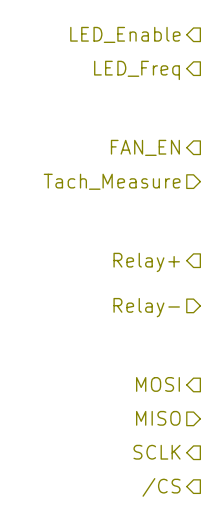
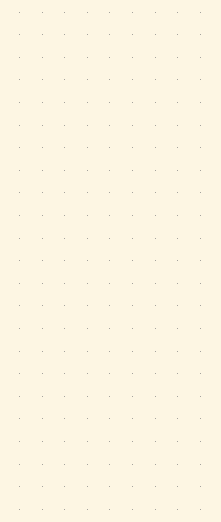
hierarchical label: LED_Enable (125, 34) -> none
hierarchical label: LED_Freq (137, 70) -> none
hierarchical label: FAN_EN (145, 147) -> none
hierarchical label: Tach_Measure (112, 181) -> none
hierarchical label: Relay+ (146, 262) -> none
hierarchical label: Relay- (146, 307) -> none
hierarchical label: MOSI (157, 384) -> none
hierarchical label: MISO (158, 418) -> none
hierarchical label: SCLK (157, 452) -> none
hierarchical label: /CS (161, 487) -> none

